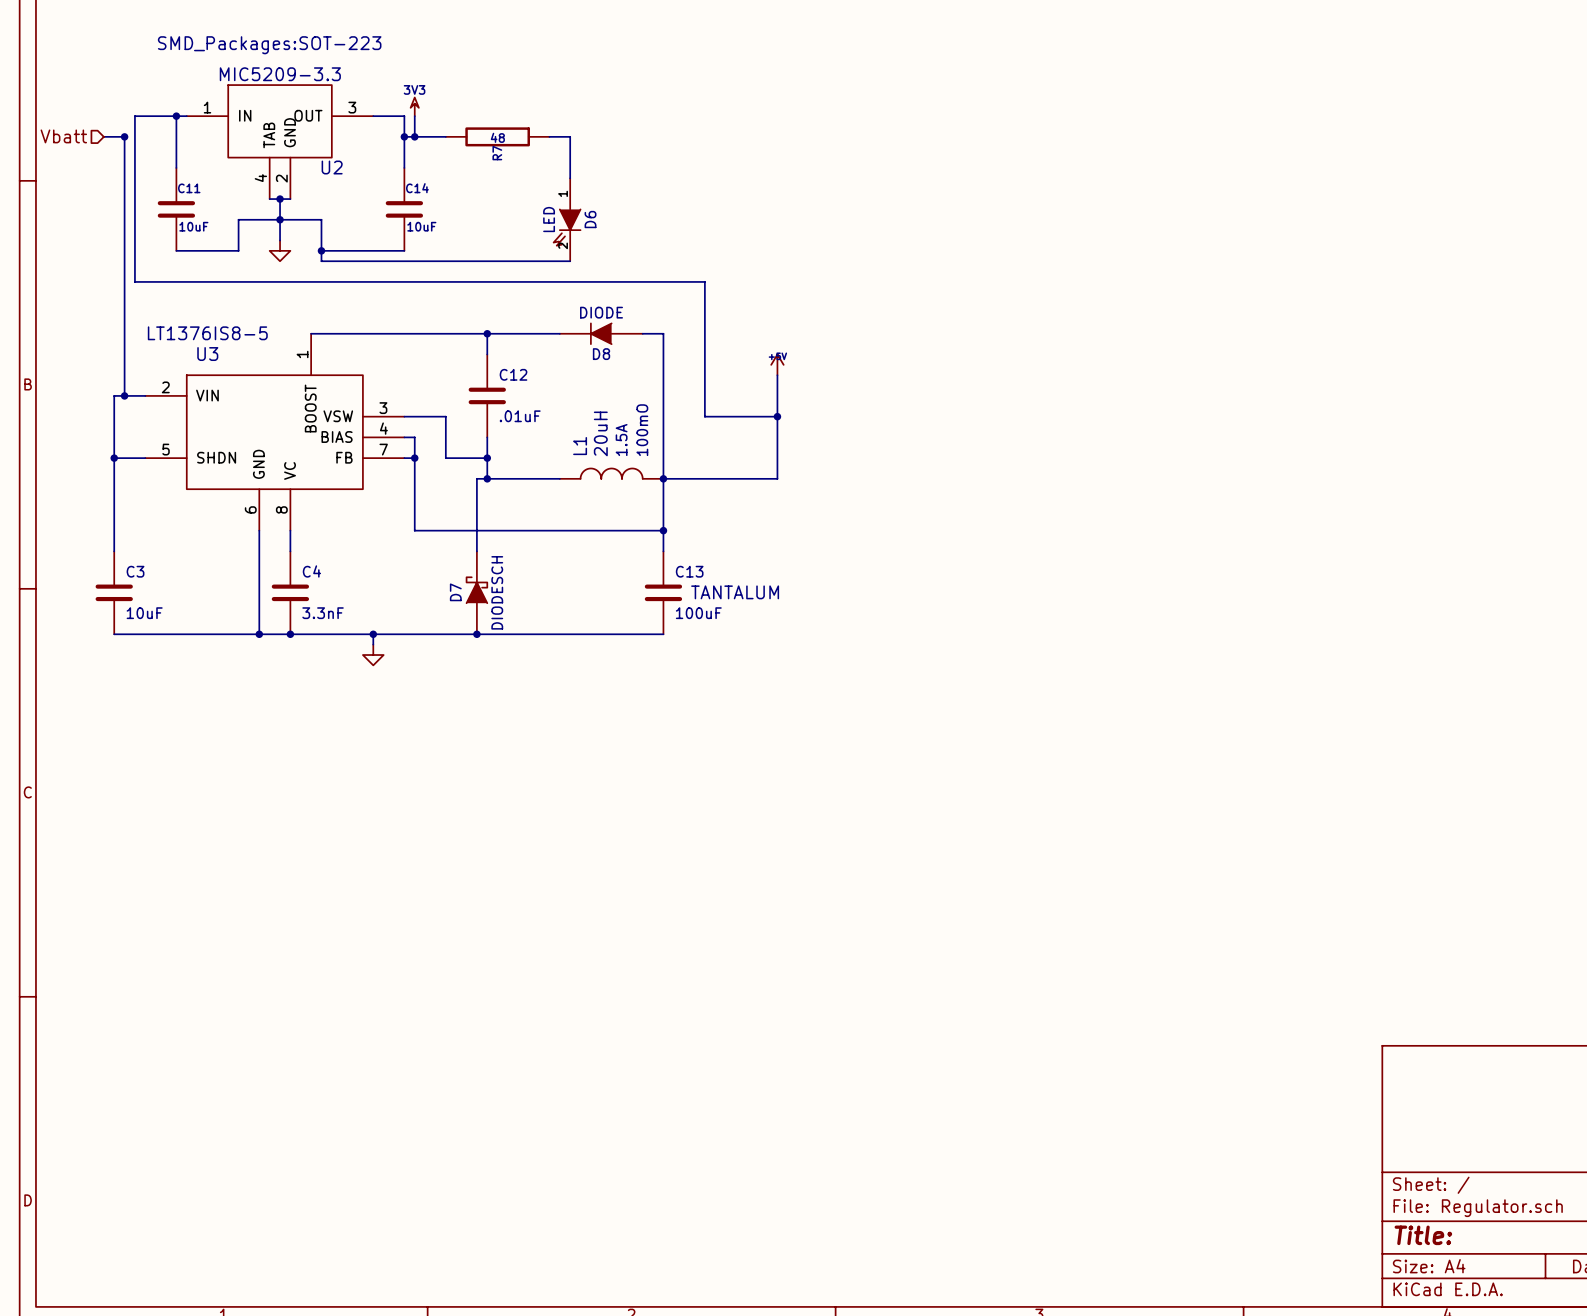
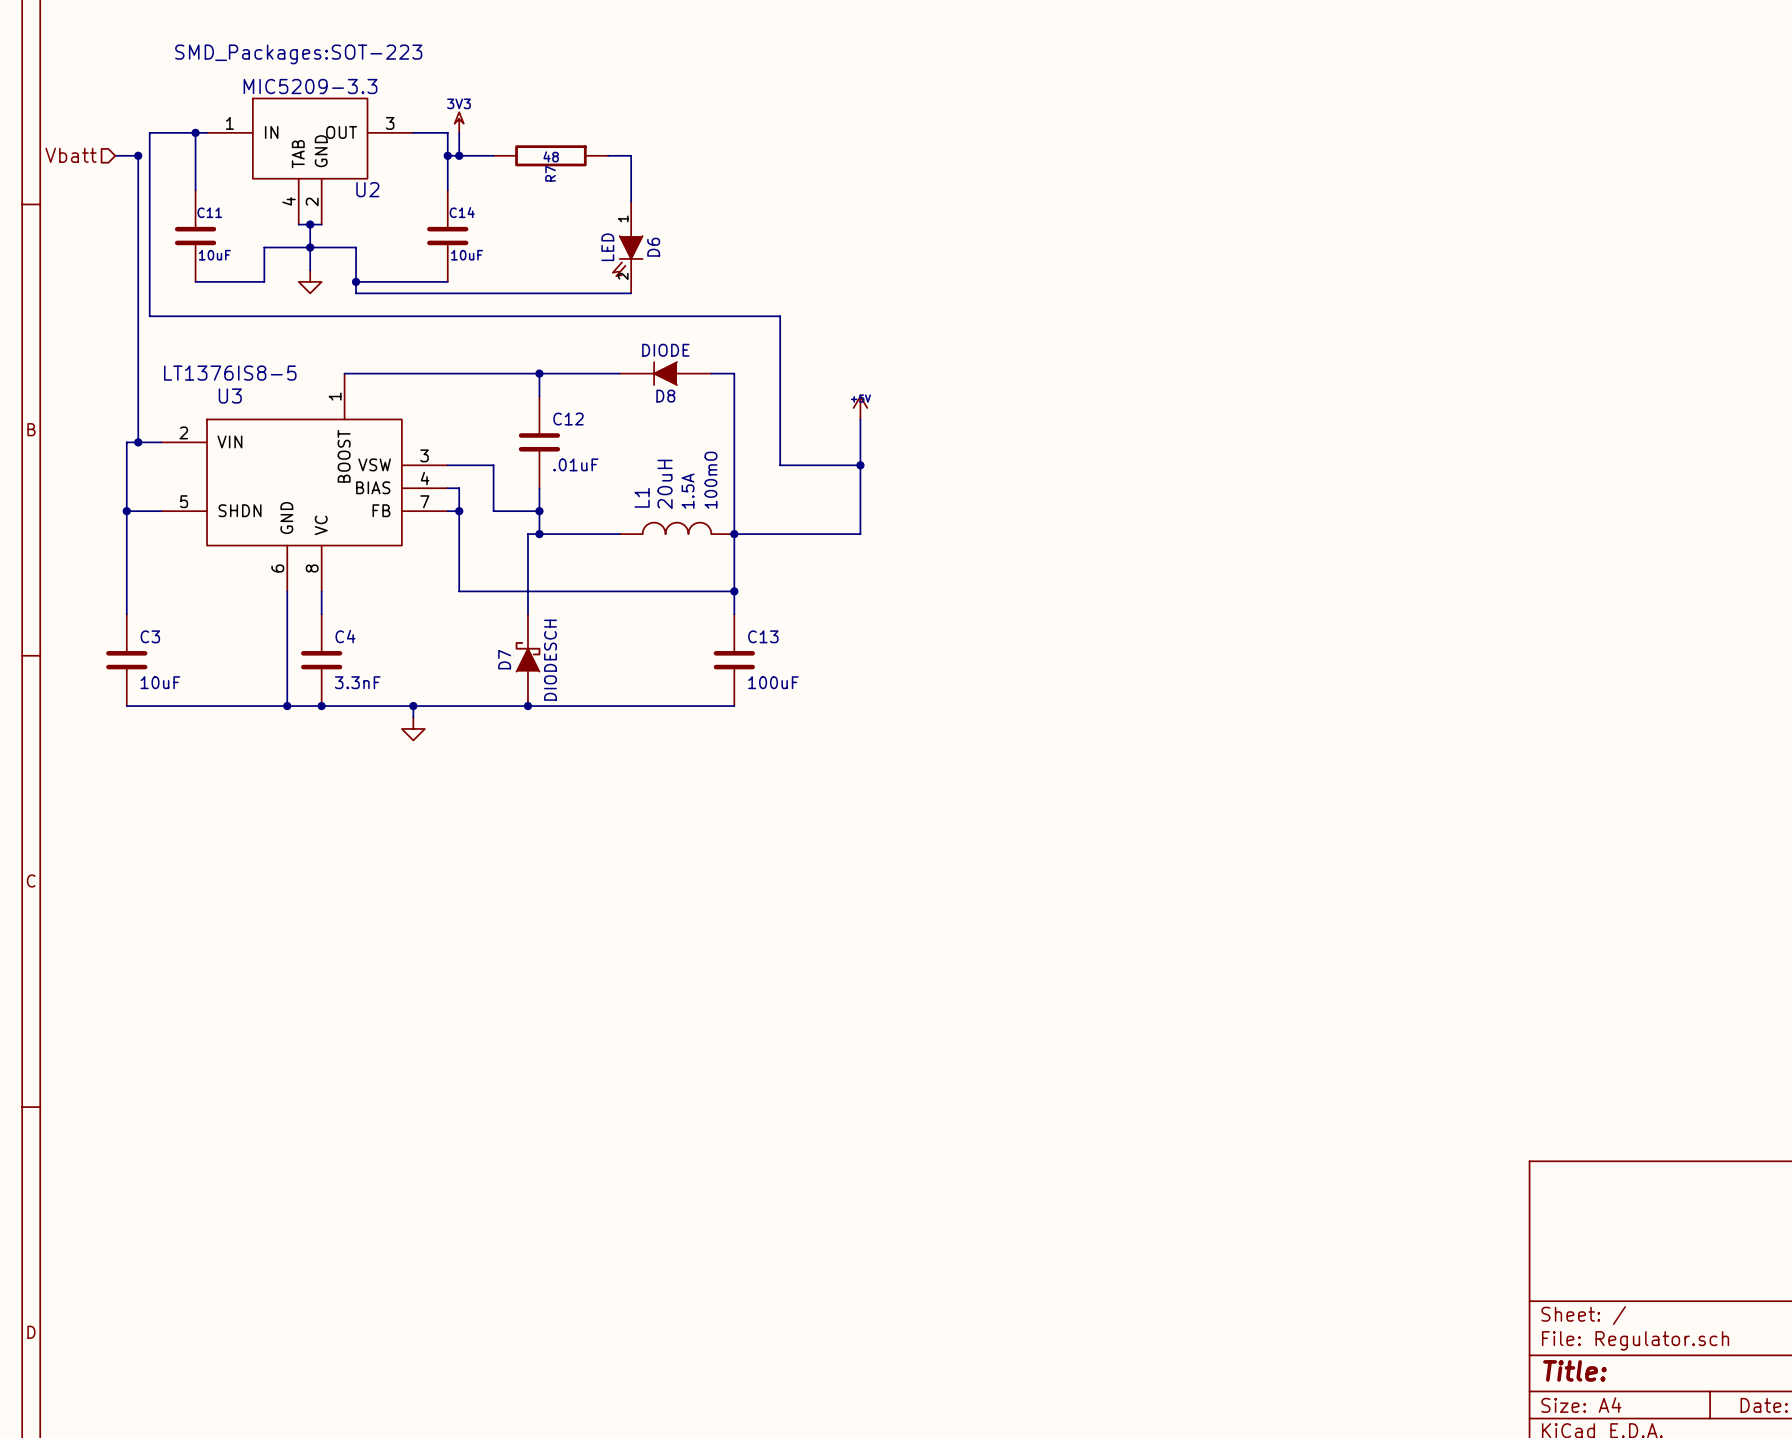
C13 text: TANTALUM (735, 592) -> none

